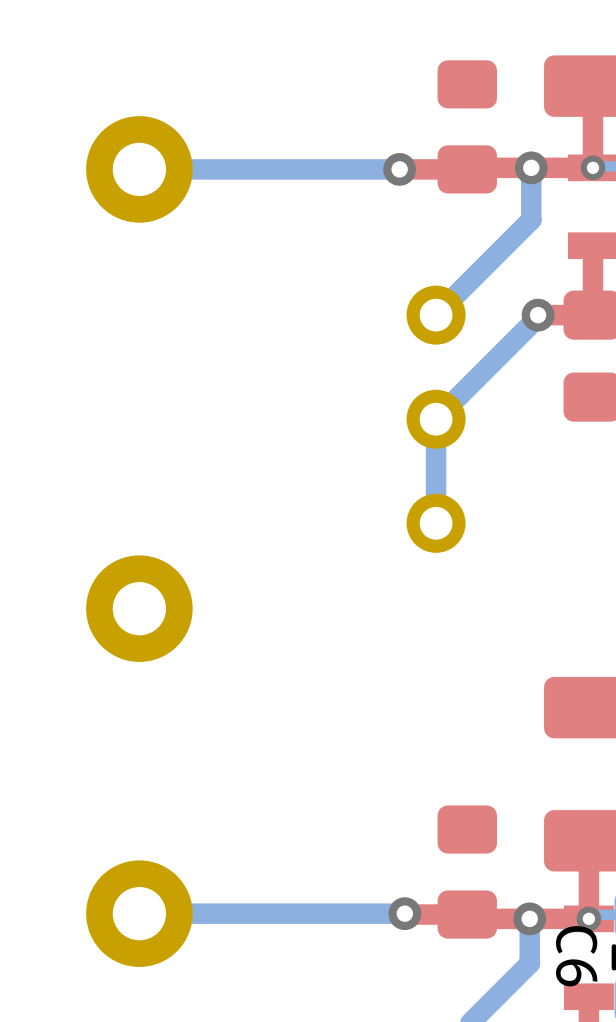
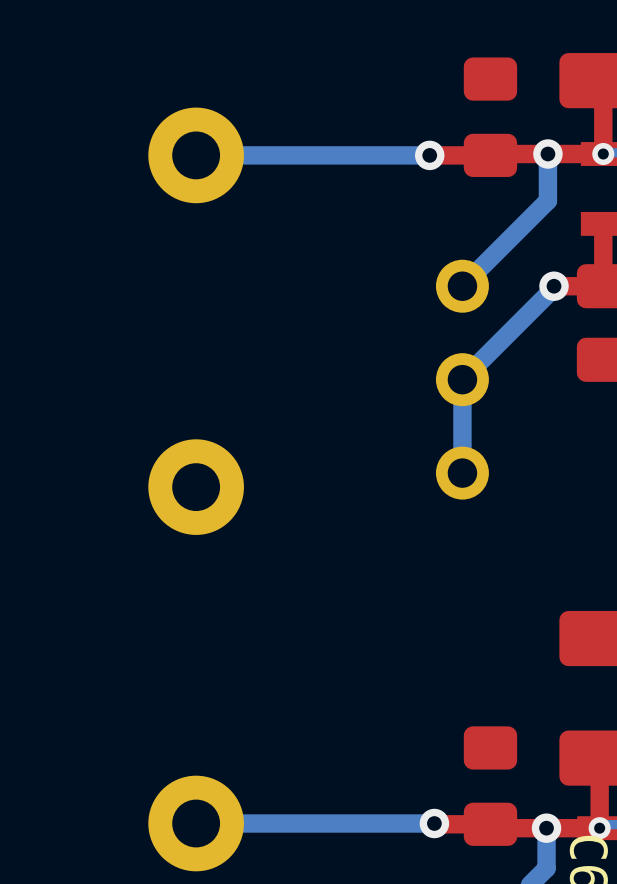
part position: (139, 608) -> (196, 487)

